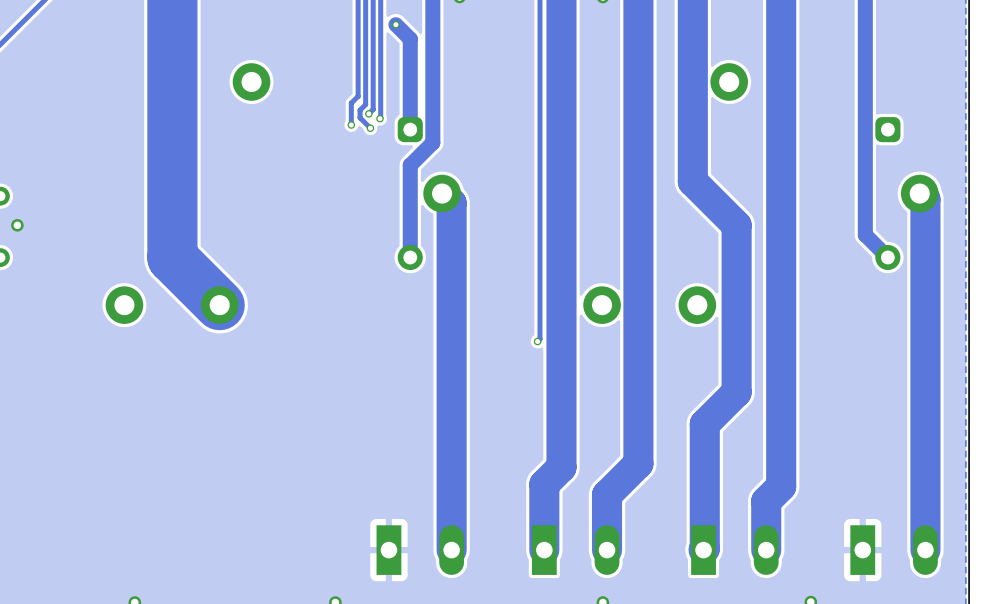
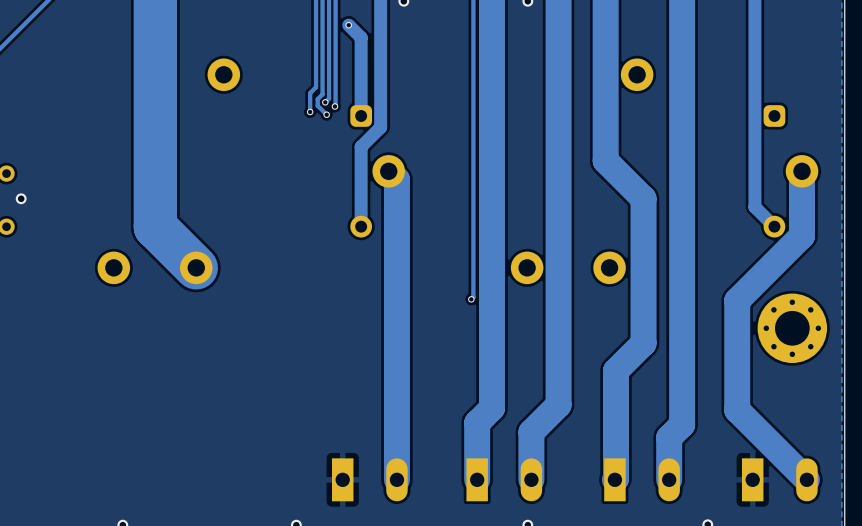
track: (919, 193) (925, 199) (925, 550) -> (802, 171) (802, 235) (737, 300) (737, 410) (806, 479)
part: none -> (792, 328)

